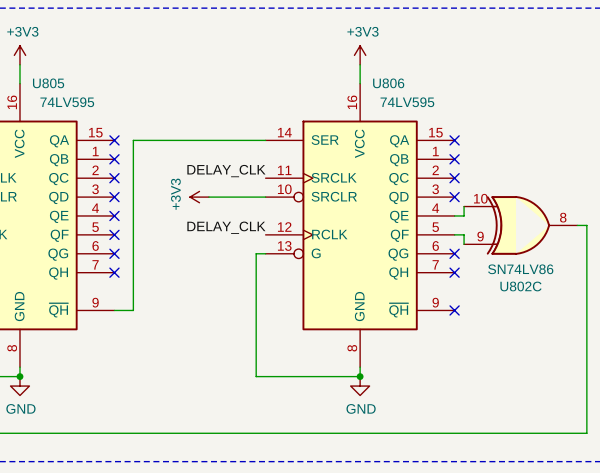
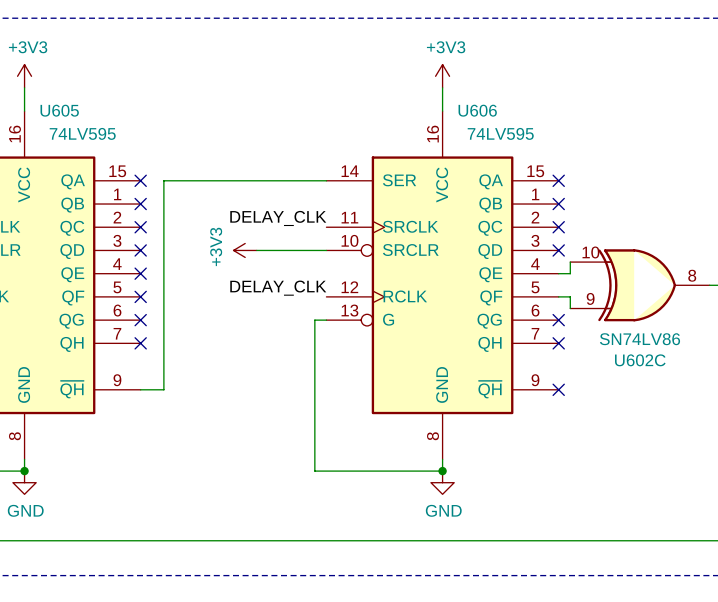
U805 name: U805 (48, 83) -> U605 (59, 110)
U806 name: U806 (388, 83) -> U606 (477, 110)
U802C name: U802C (521, 286) -> U602C (640, 360)

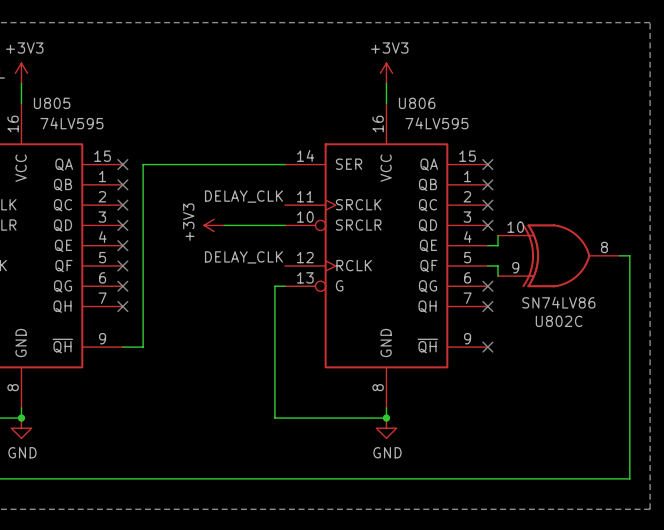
U605 name: U605 (59, 110) -> U805 (52, 103)
U606 name: U606 (477, 110) -> U806 (417, 103)
U602C name: U602C (640, 360) -> U802C (559, 321)

